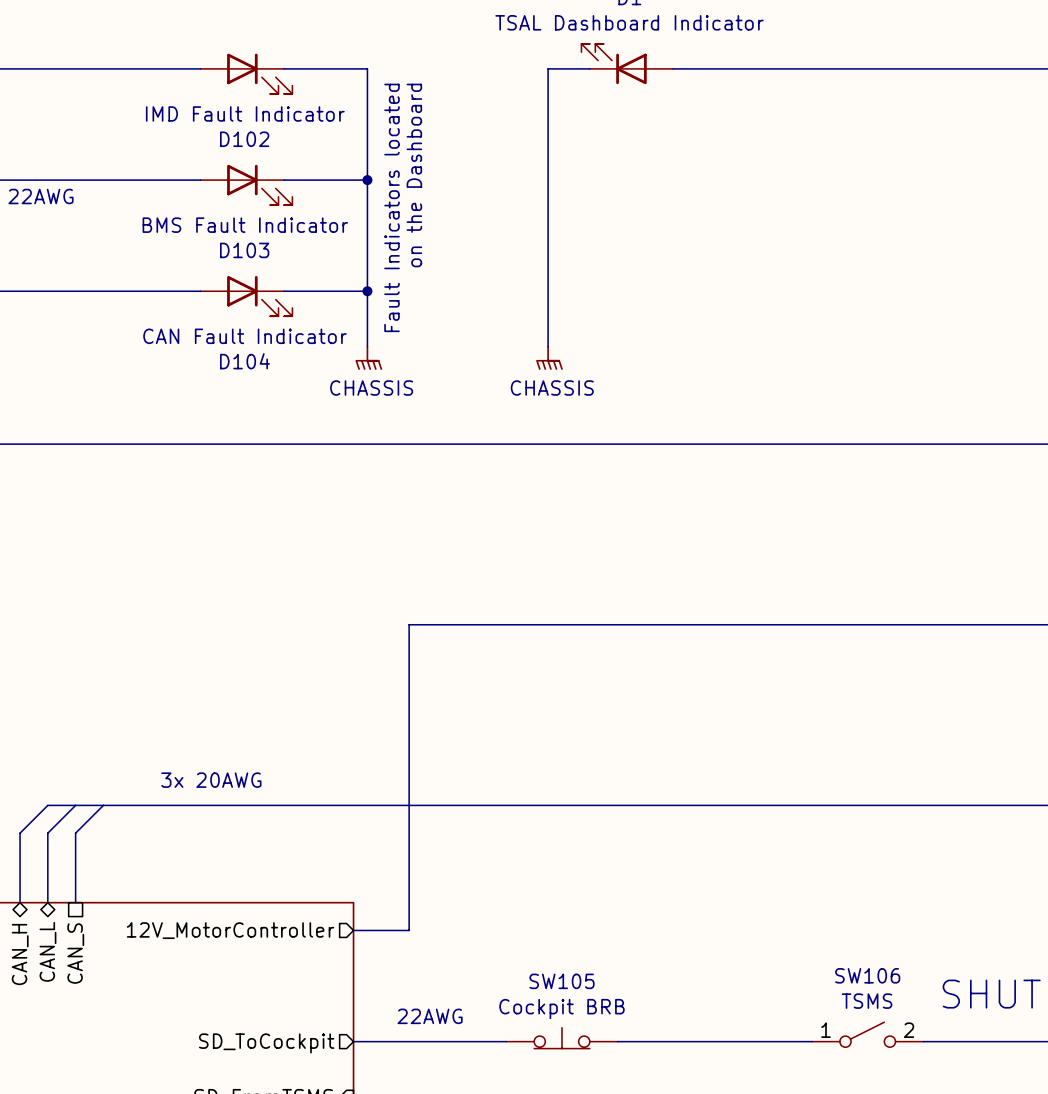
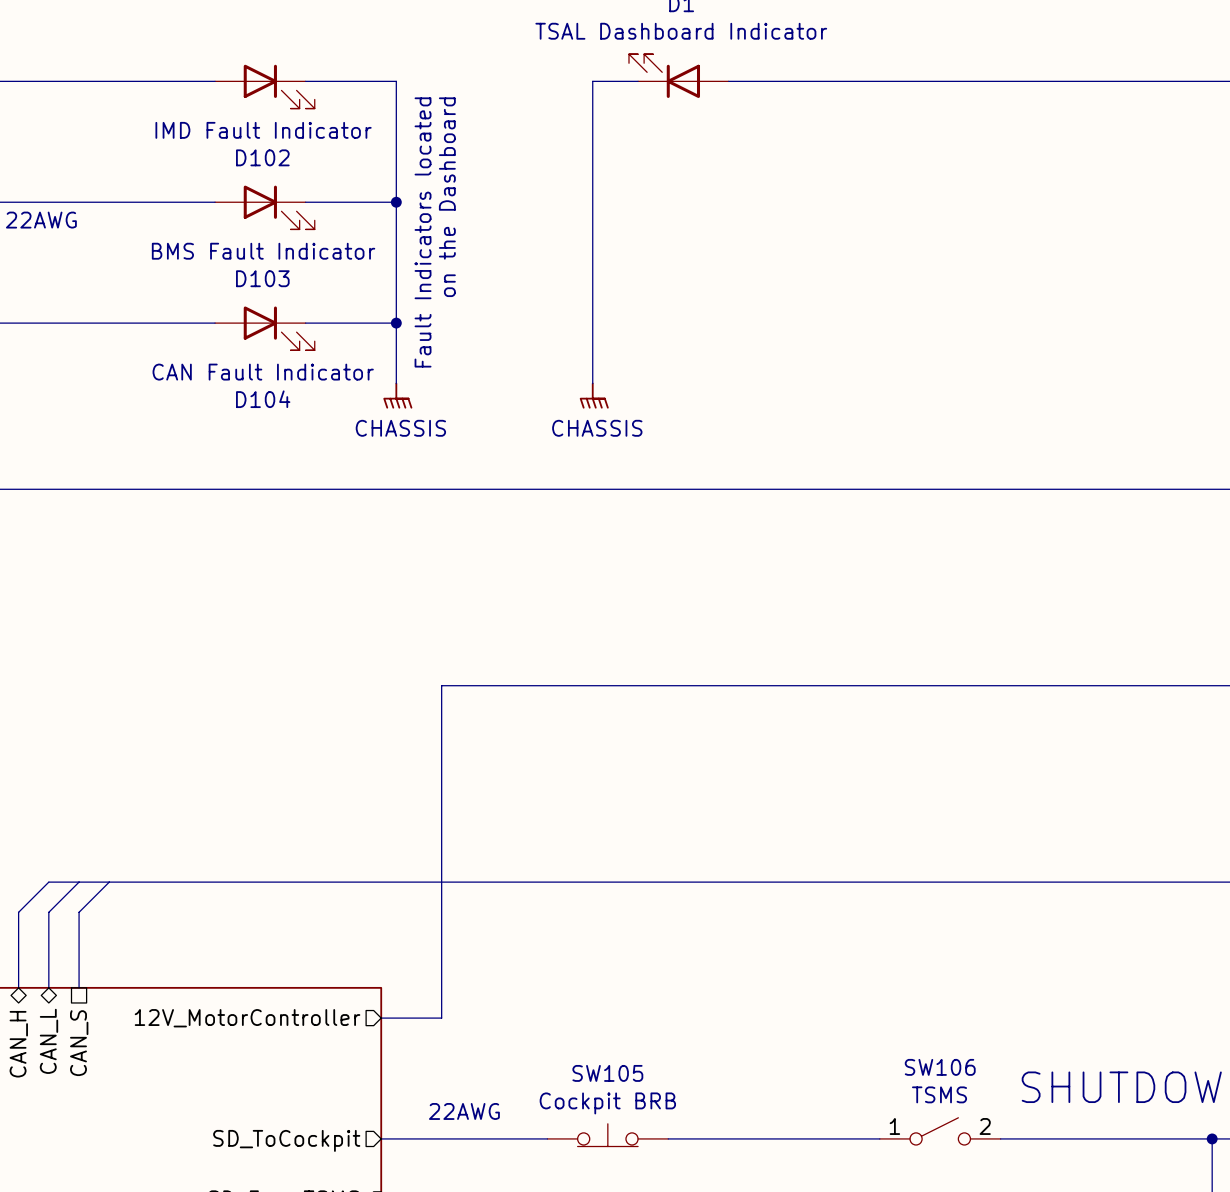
text: 3x 20AWG (211, 780) -> none

